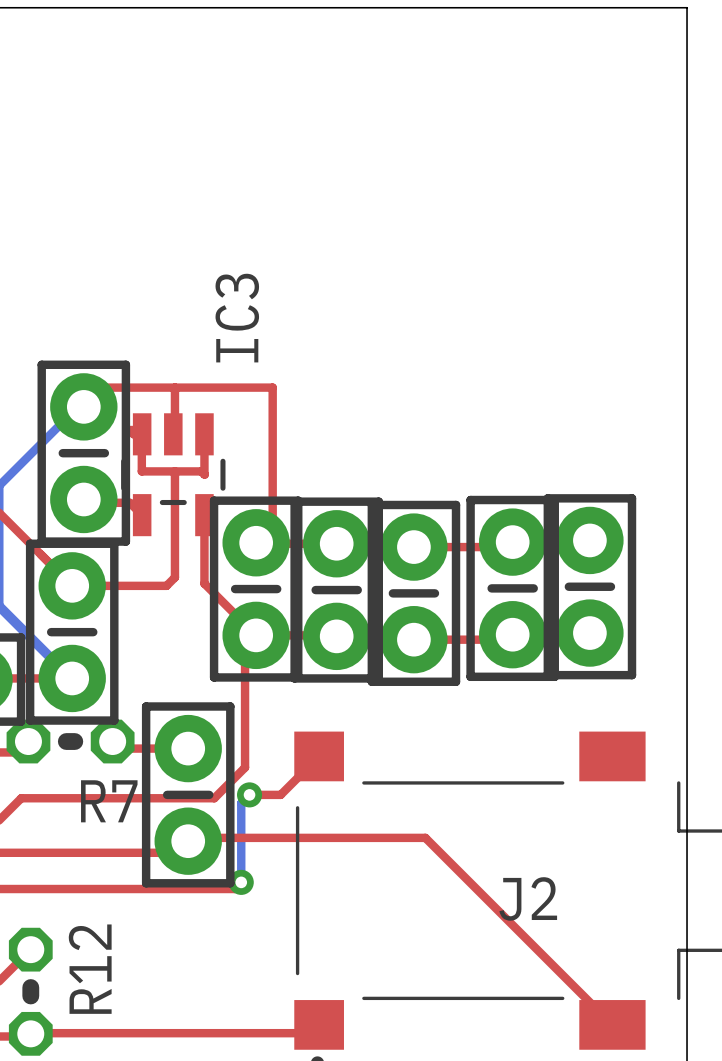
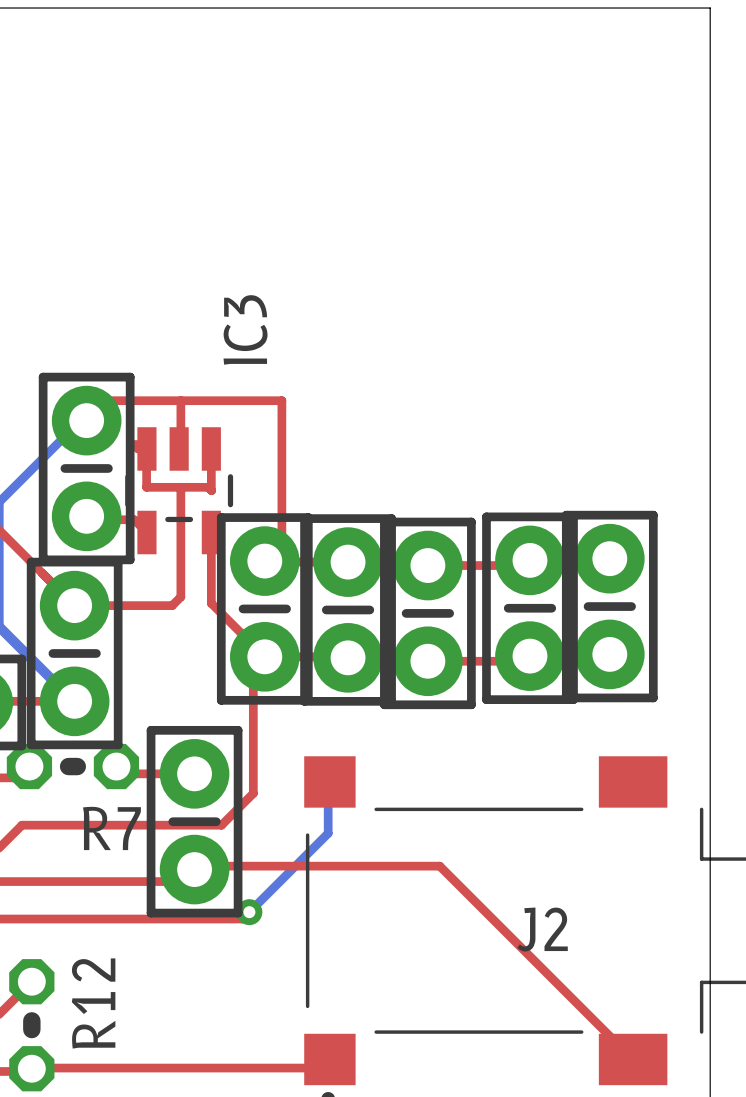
top track: (319, 756) (280, 794) (249, 794) -> none
bottom track: (249, 794) (241, 803) (241, 882) -> (323, 773) (323, 776) (328, 781) (328, 833) (249, 912)
via: (249, 794) -> none

